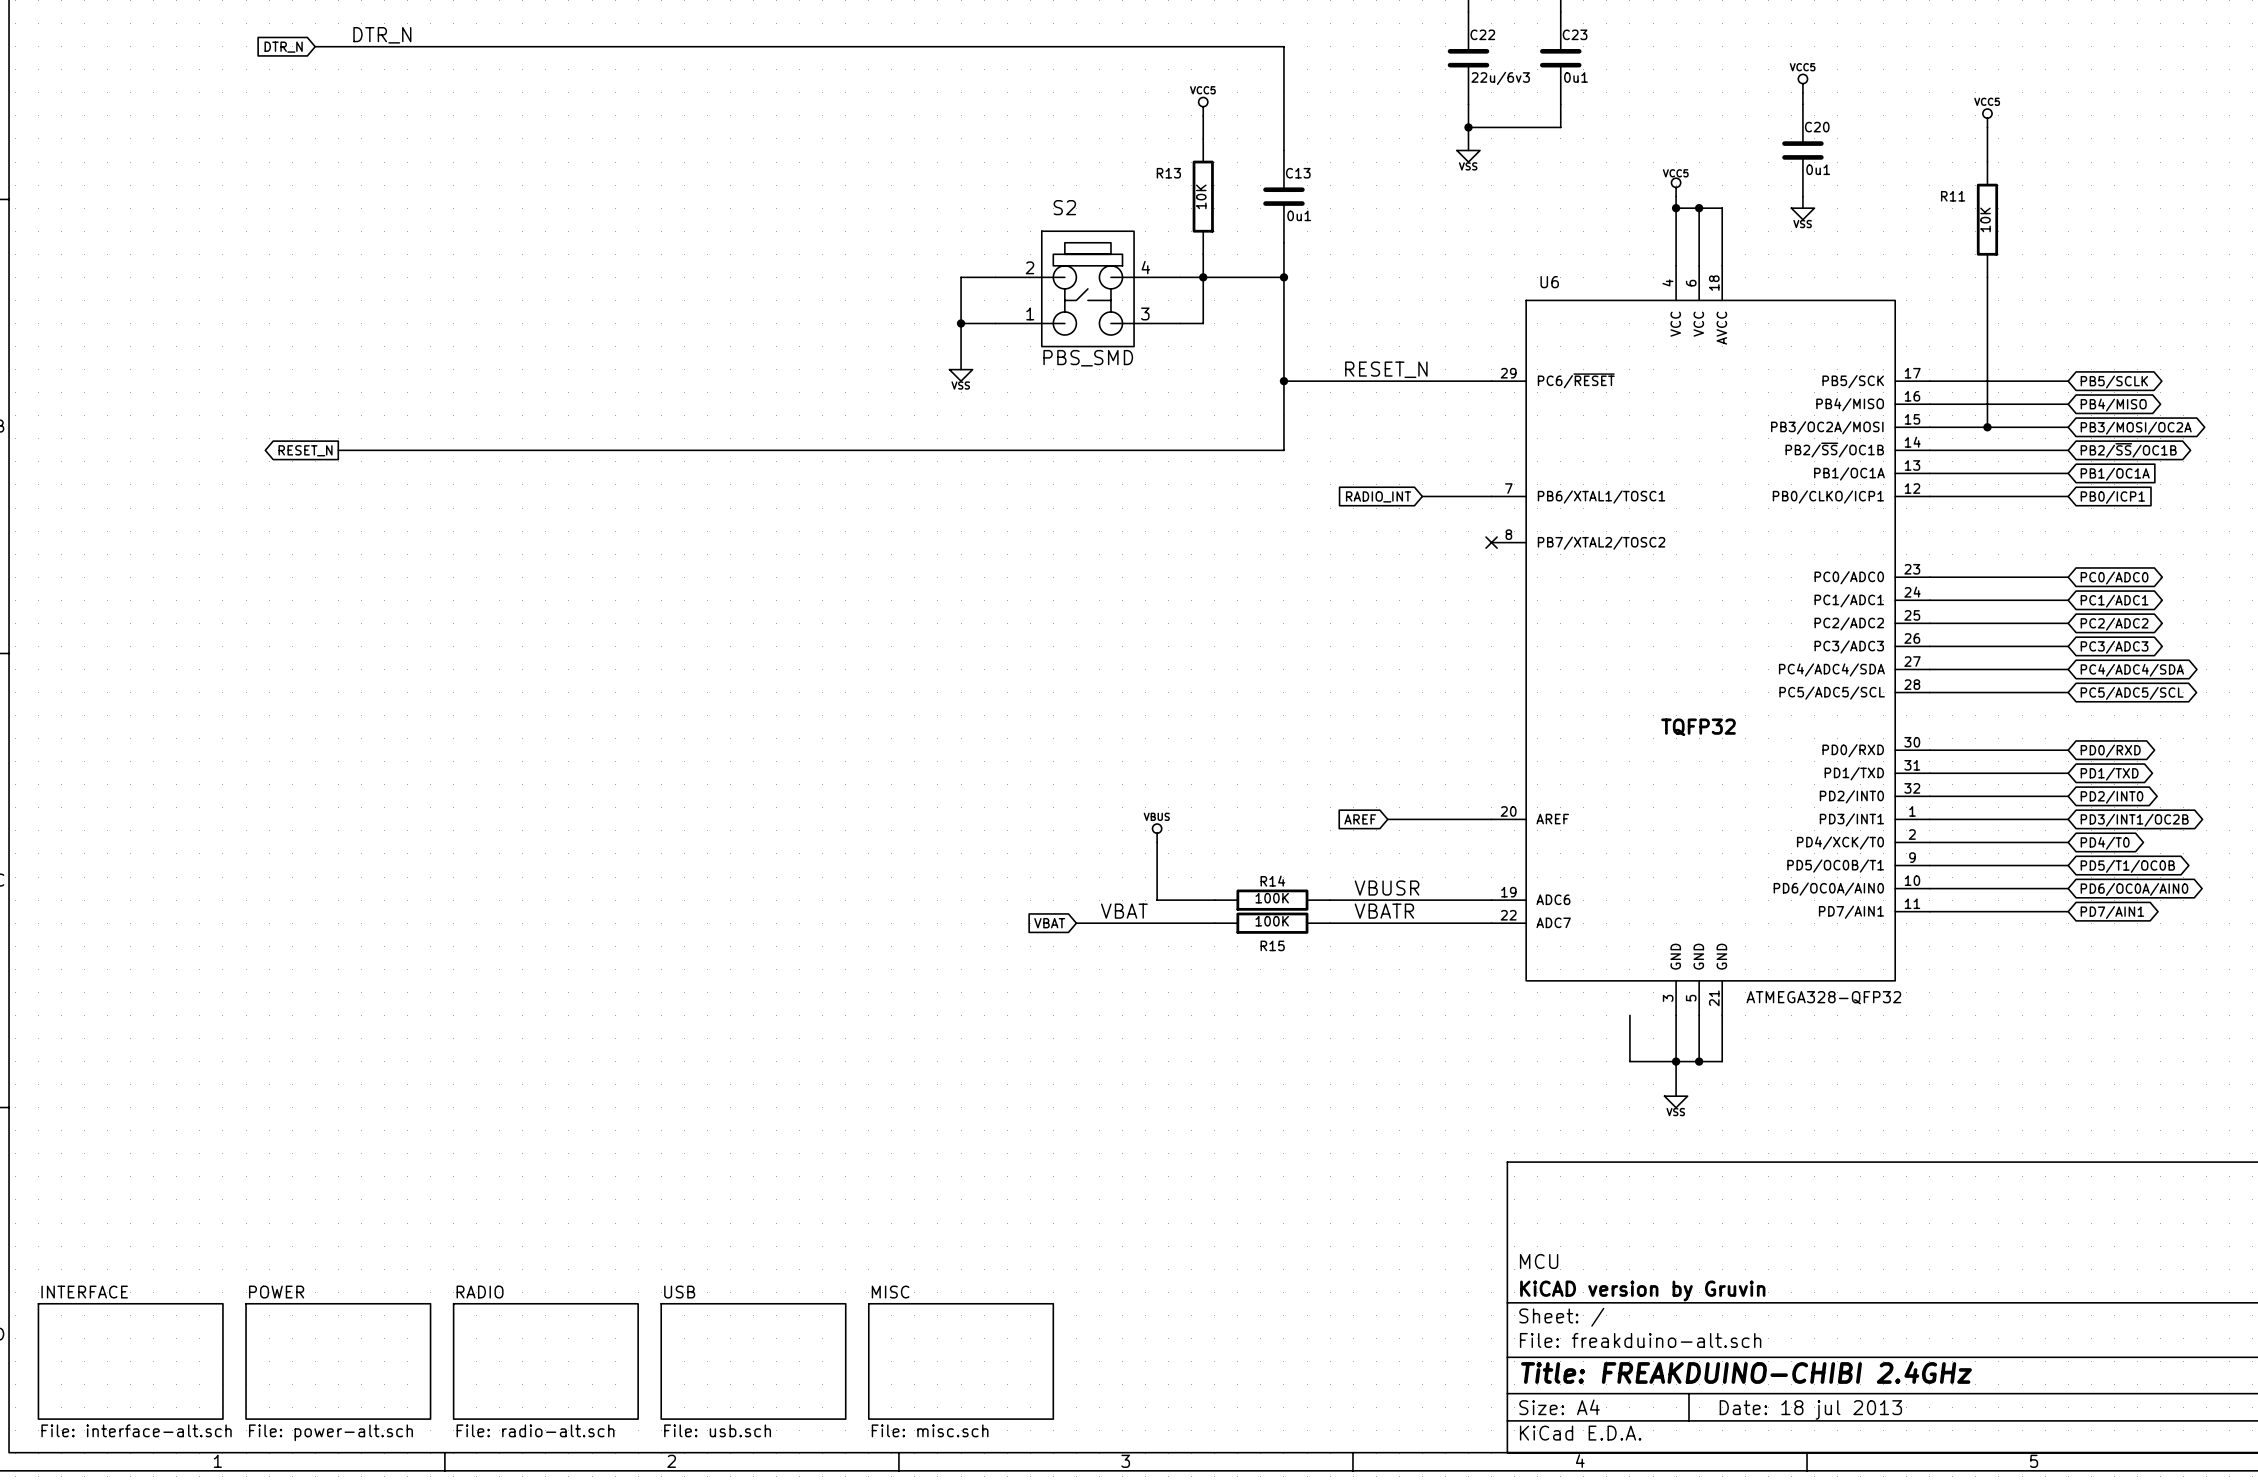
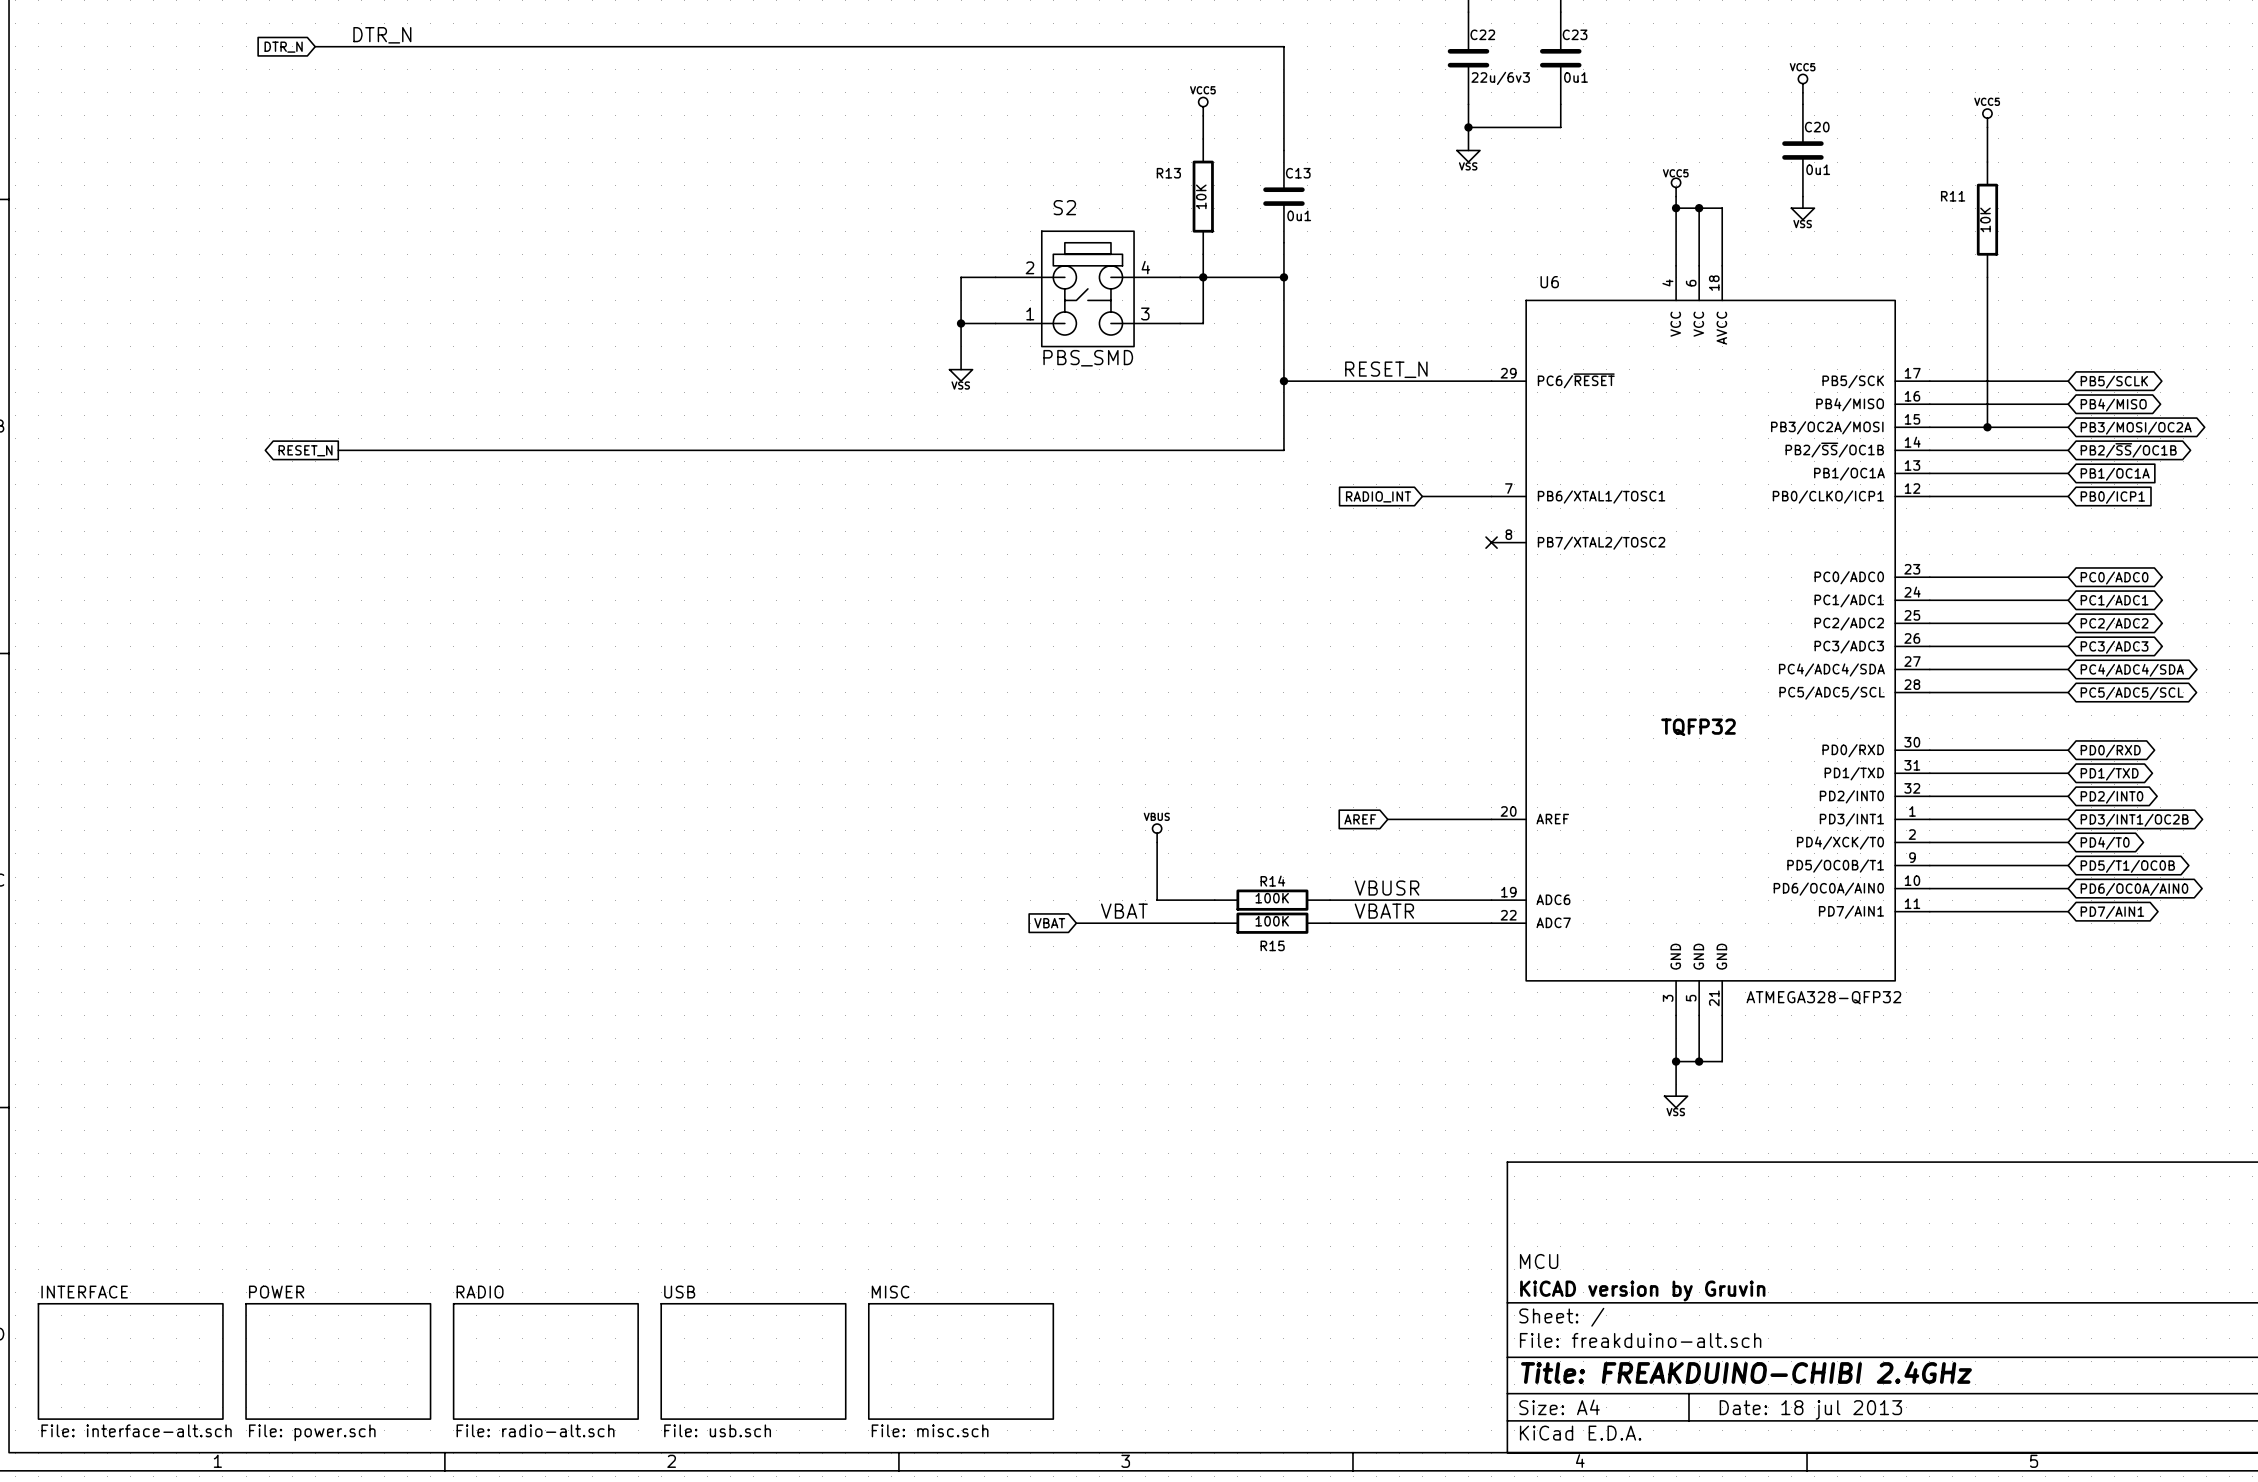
wire: (1629, 1015) (1629, 1061) (1676, 1061) -> none
sheet POWER value: File: power-alt.sch (330, 1432) -> File: power.sch (312, 1432)

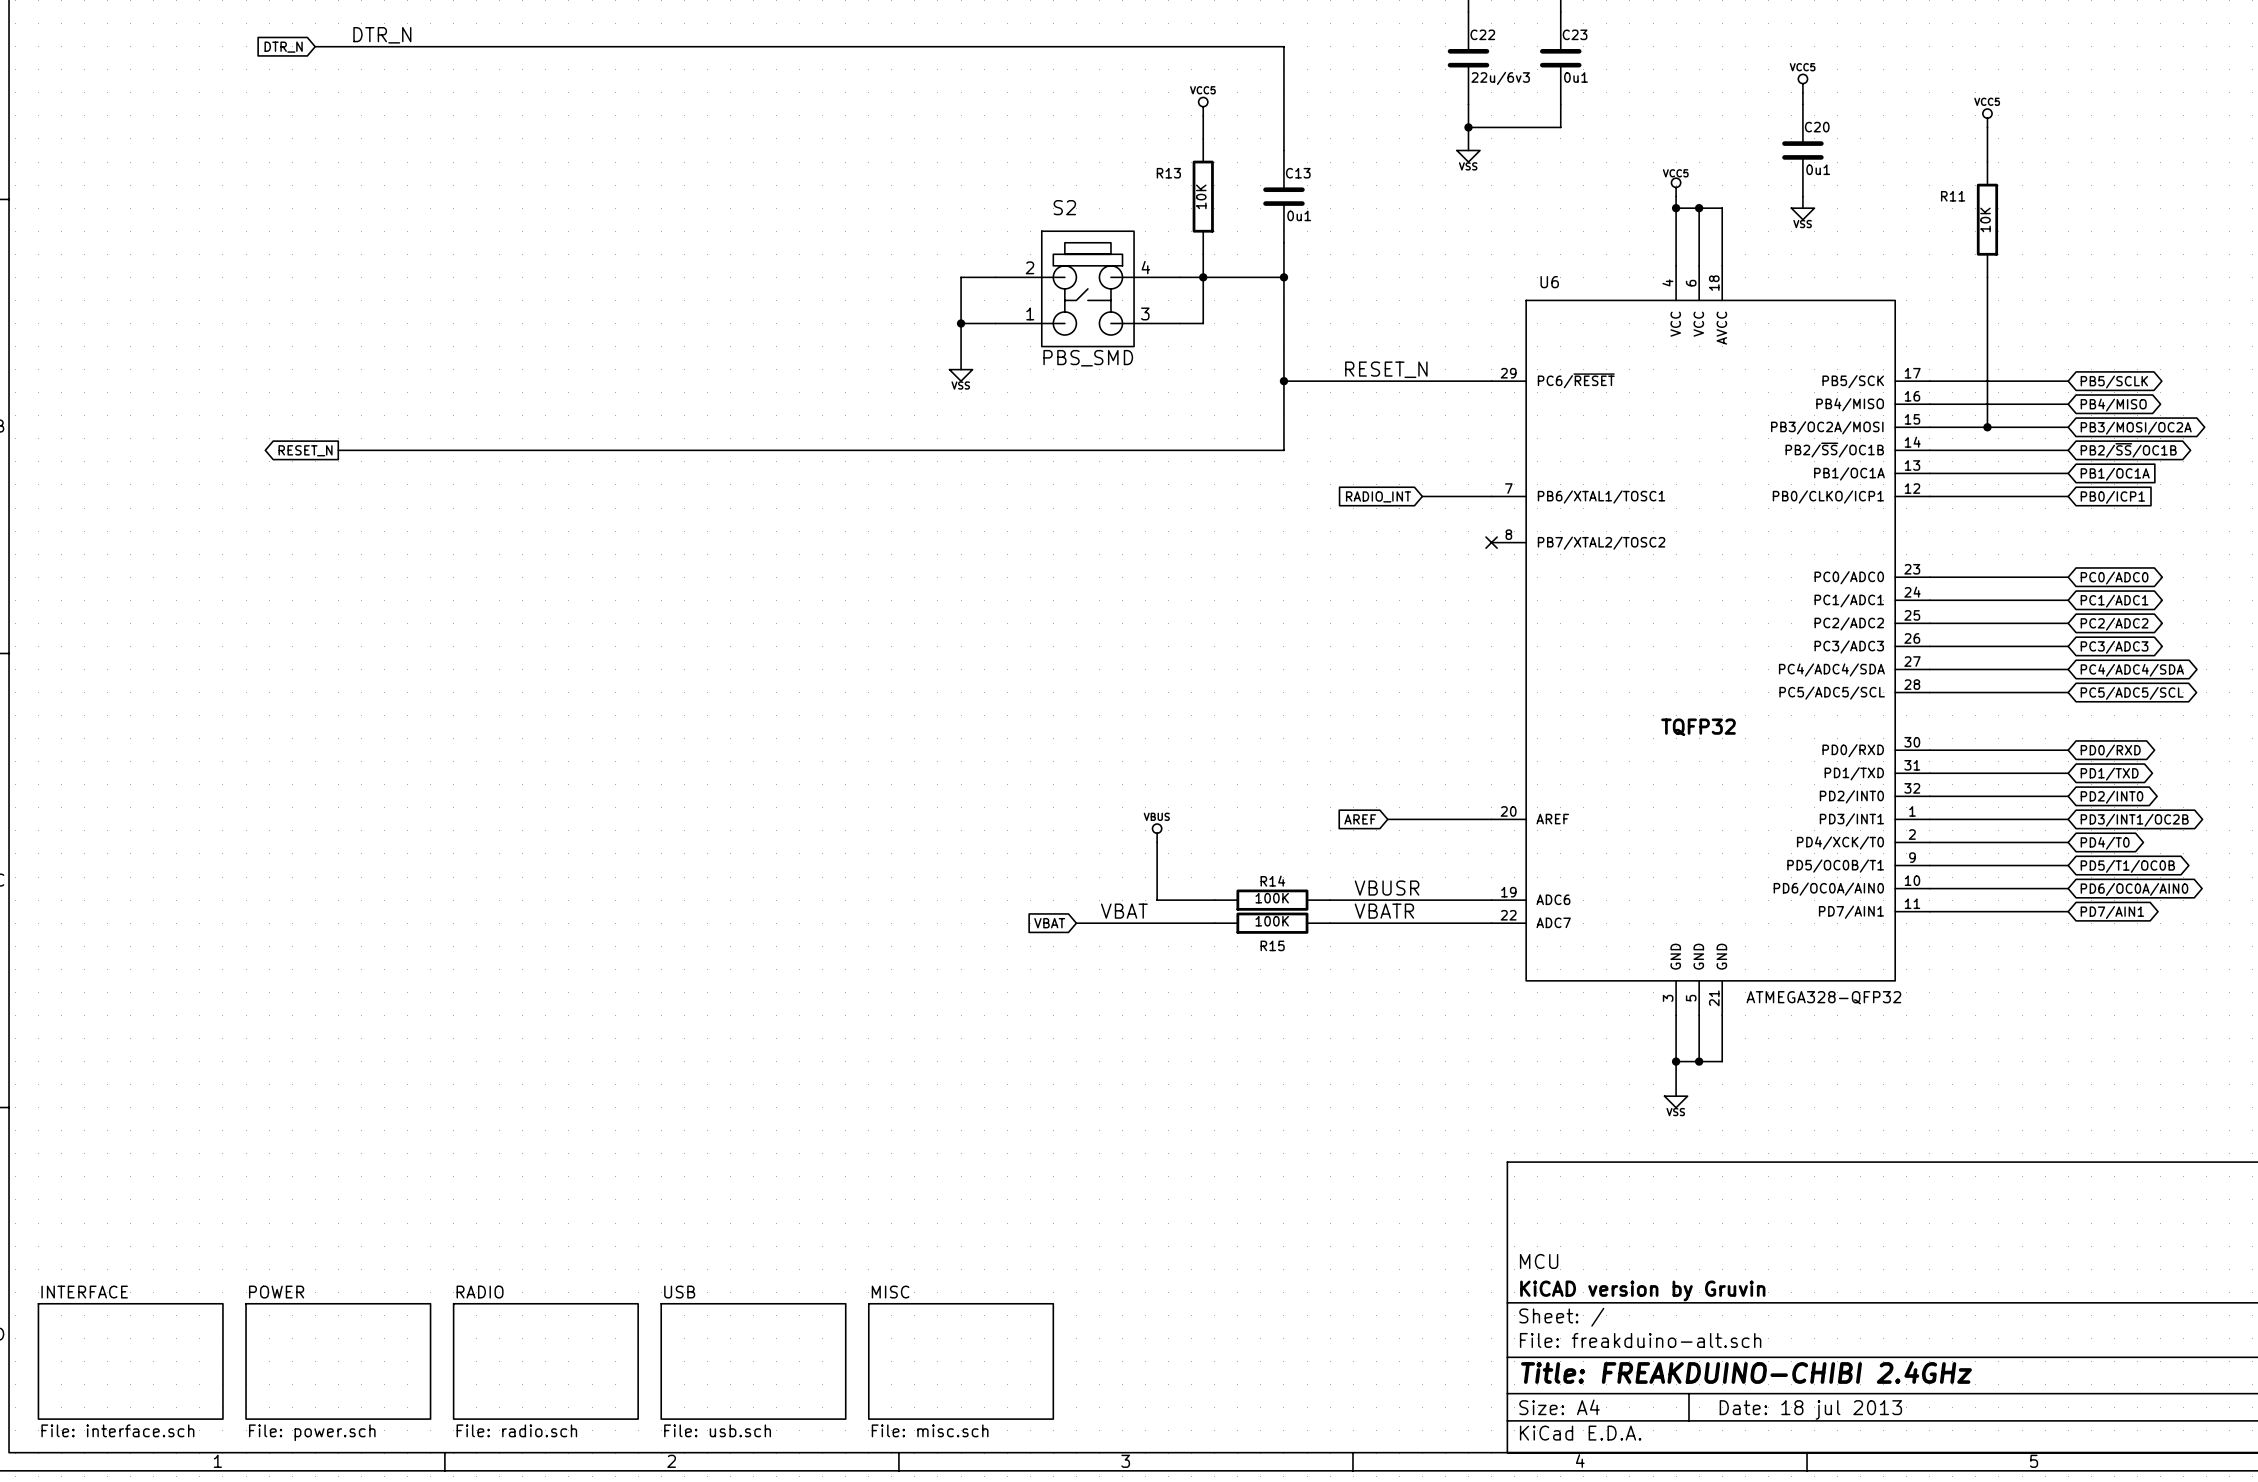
sheet INTERFACE value: File: interface-alt.sch (136, 1430) -> File: interface.sch (117, 1430)
sheet RADIO value: File: radio-alt.sch (535, 1430) -> File: radio.sch (516, 1430)

